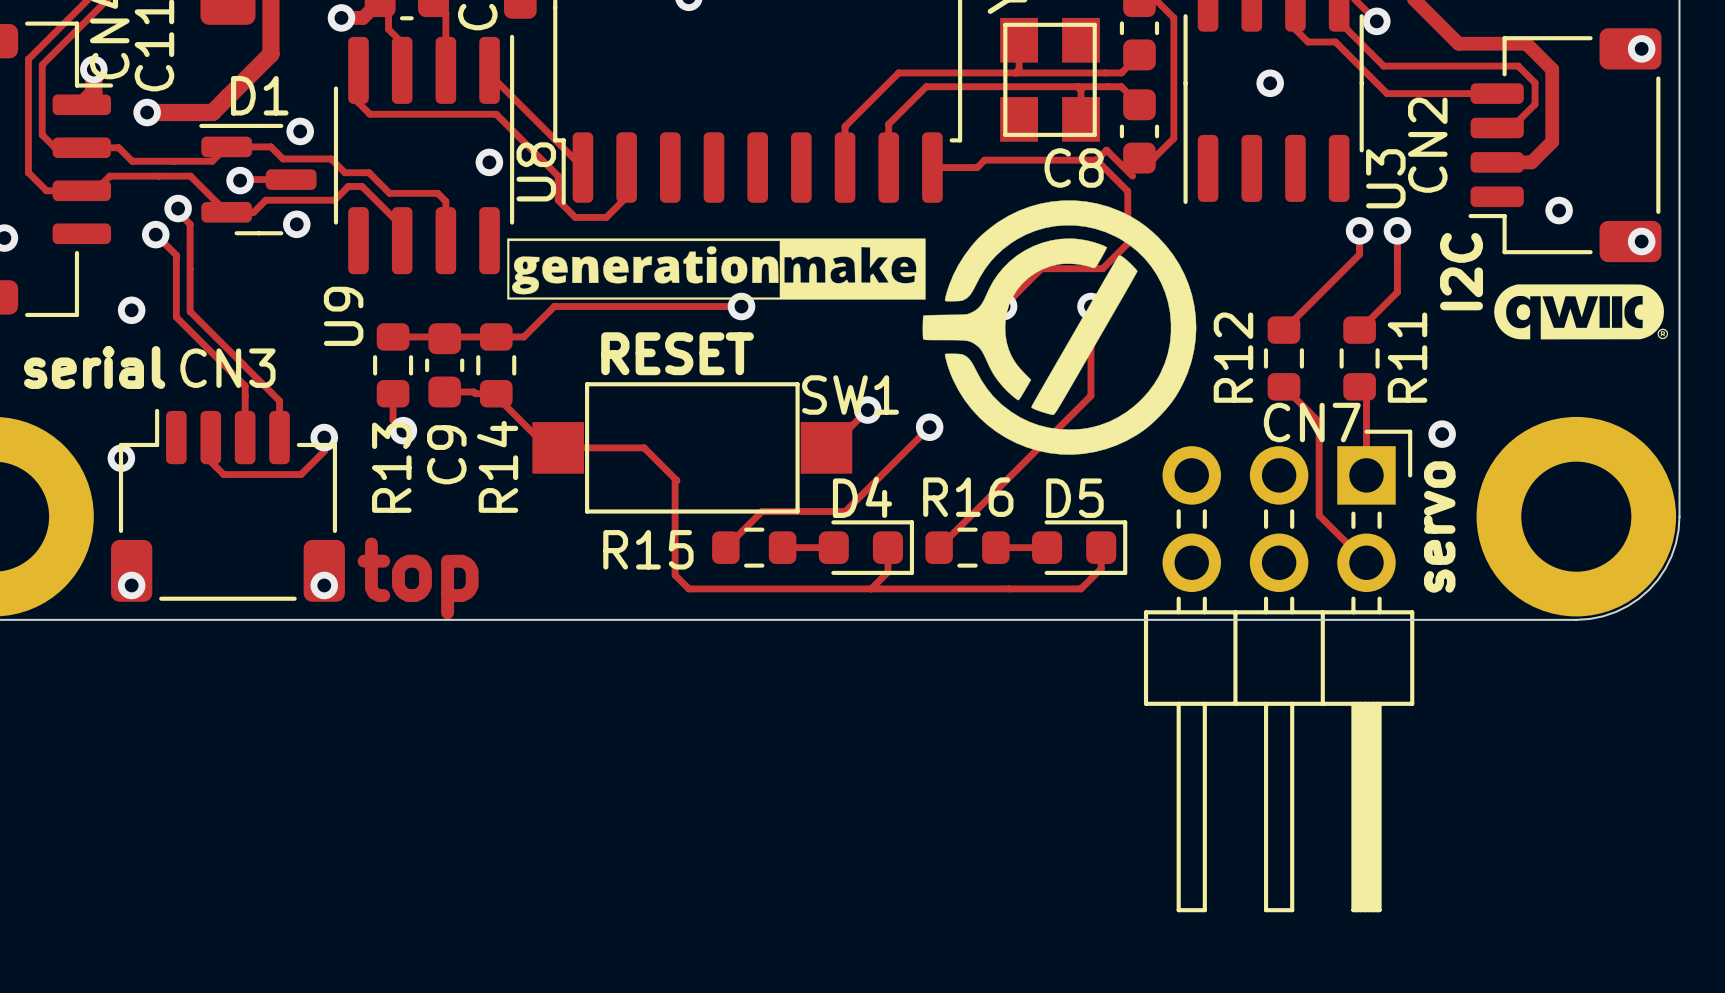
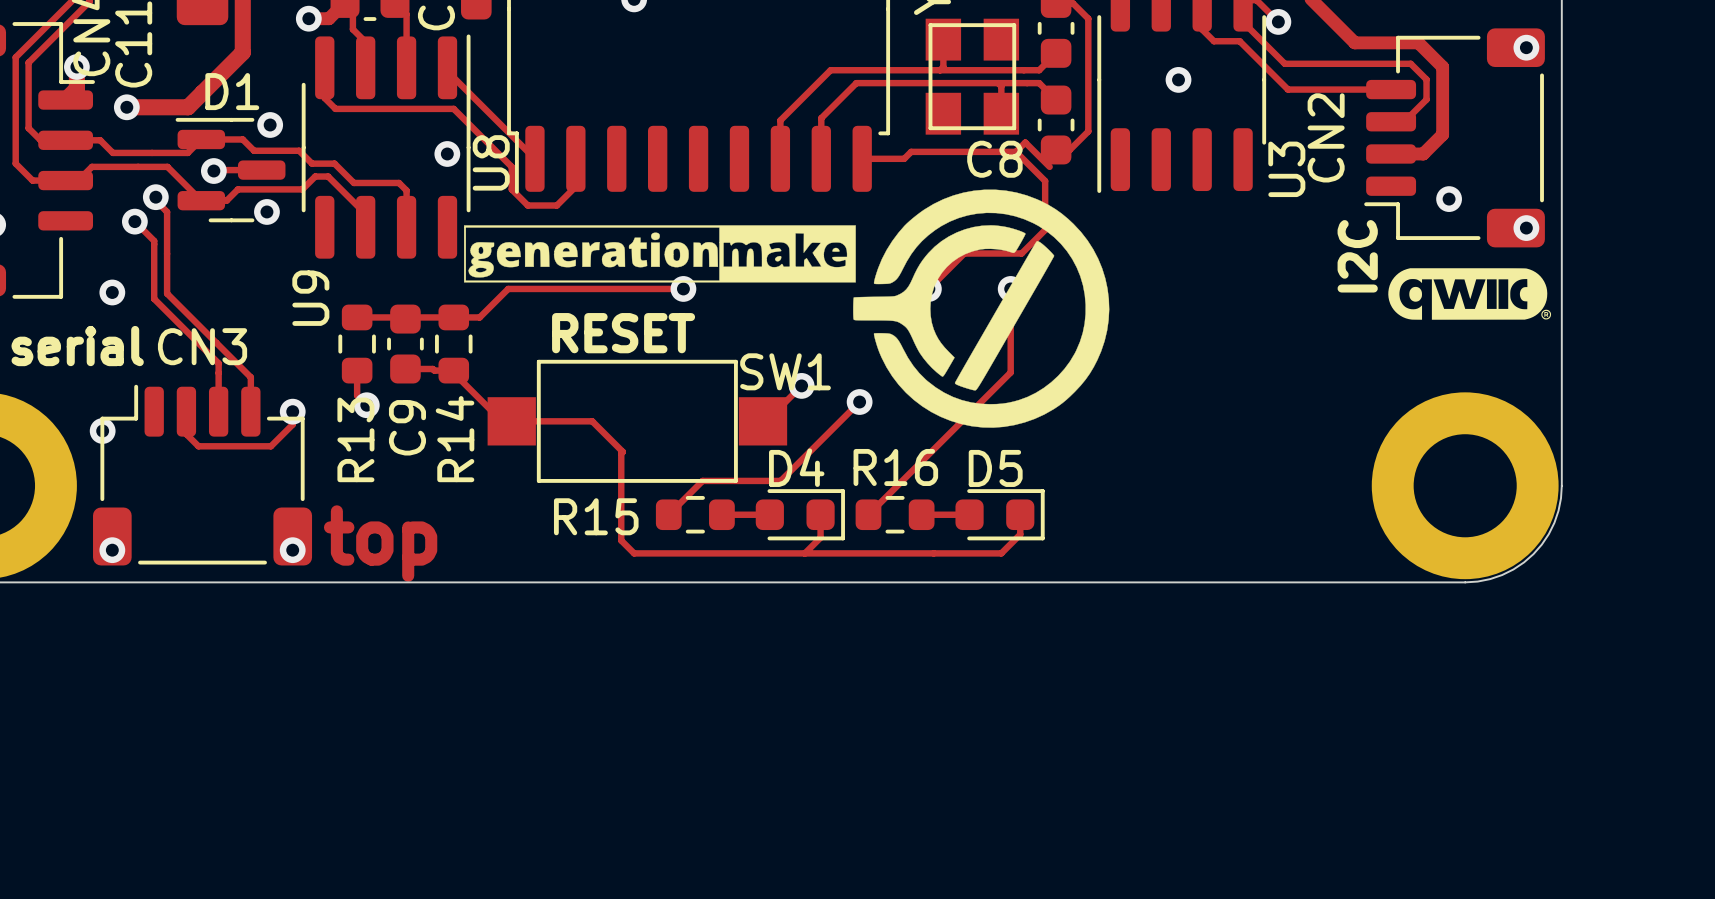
track: (1359, 230) (1359, 254) (1283, 330) -> none
via: (1359, 230) -> none
track: (1397, 230) (1397, 292) (1359, 330) -> none
via: (1397, 230) -> none
R12: (1283, 358) -> none
R11: (1359, 358) -> none
track: (1283, 386) (1319, 422) (1319, 515) (1366, 562) -> none
track: (1359, 386) (1366, 393) (1366, 475) -> none
via: (1442, 434) -> none
text: servo (1439, 527) -> none
CN7: (1279, 670) -> none

